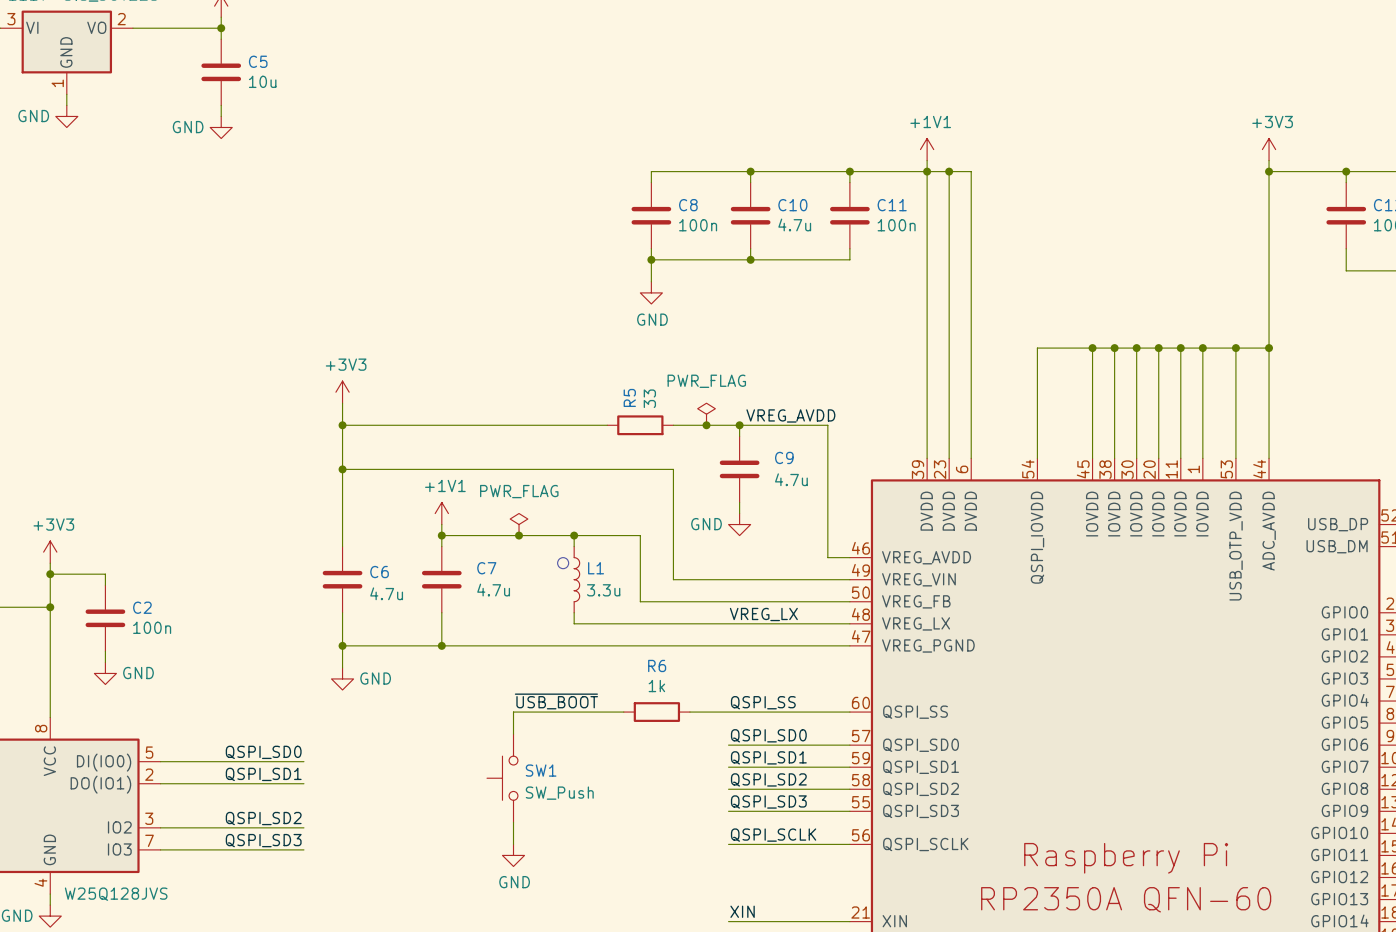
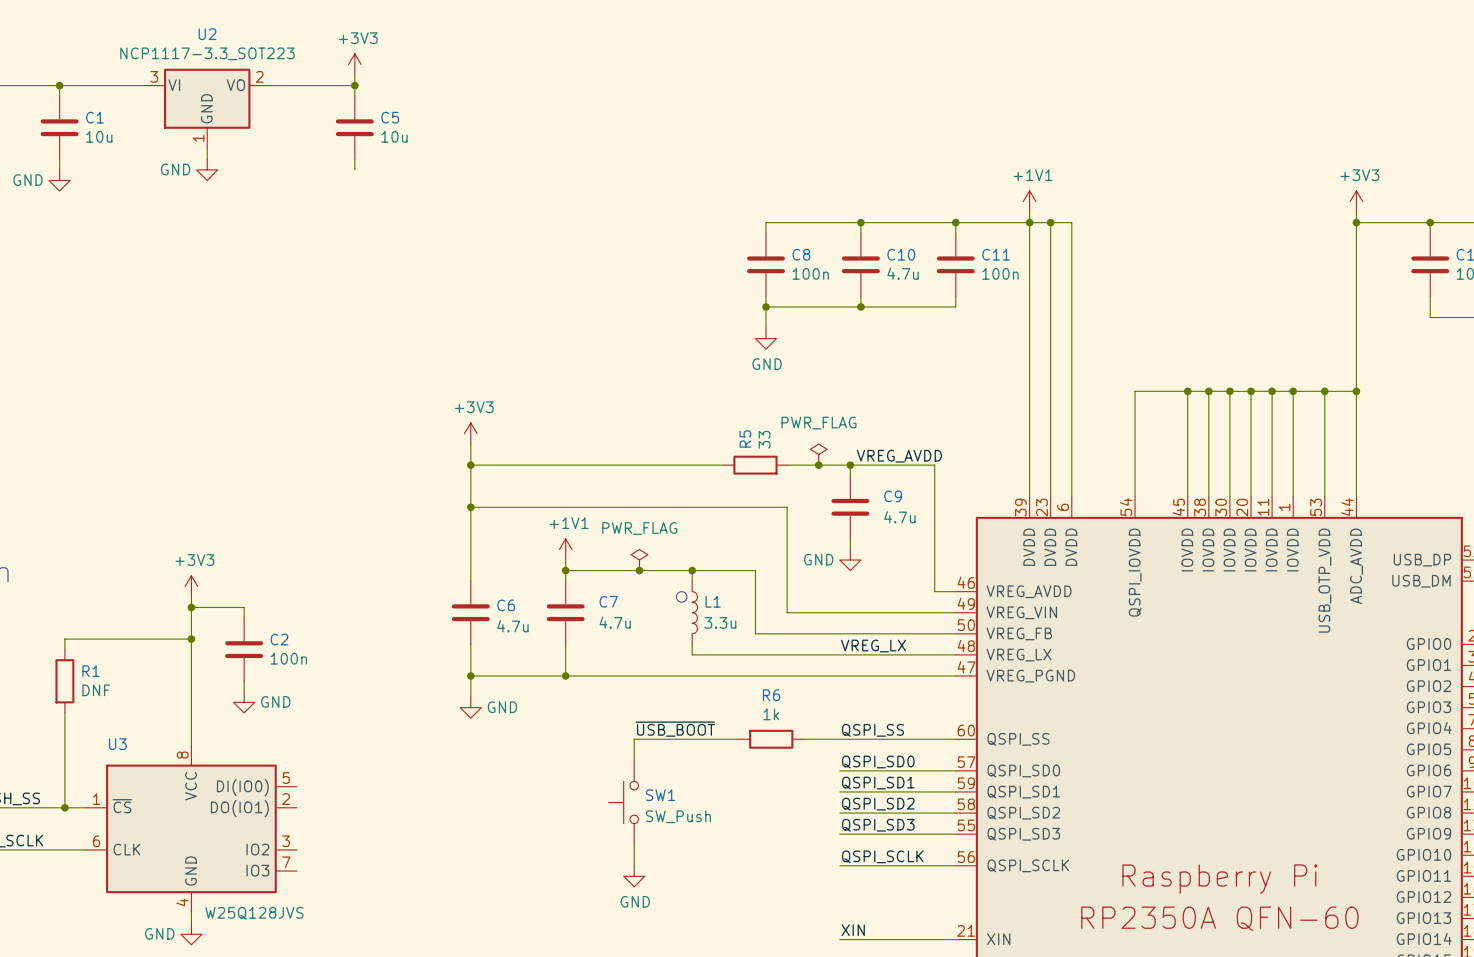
power symbol: GND (221, 127) -> none
label: QSPI_SD0 (263, 752) -> none
wire: (160, 761) (303, 761) -> none
label: QSPI_SD1 (263, 774) -> none
wire: (160, 783) (303, 783) -> none
label: QSPI_SD2 (263, 818) -> none
wire: (160, 827) (303, 827) -> none
label: QSPI_SD3 (263, 840) -> none
wire: (160, 849) (303, 849) -> none

